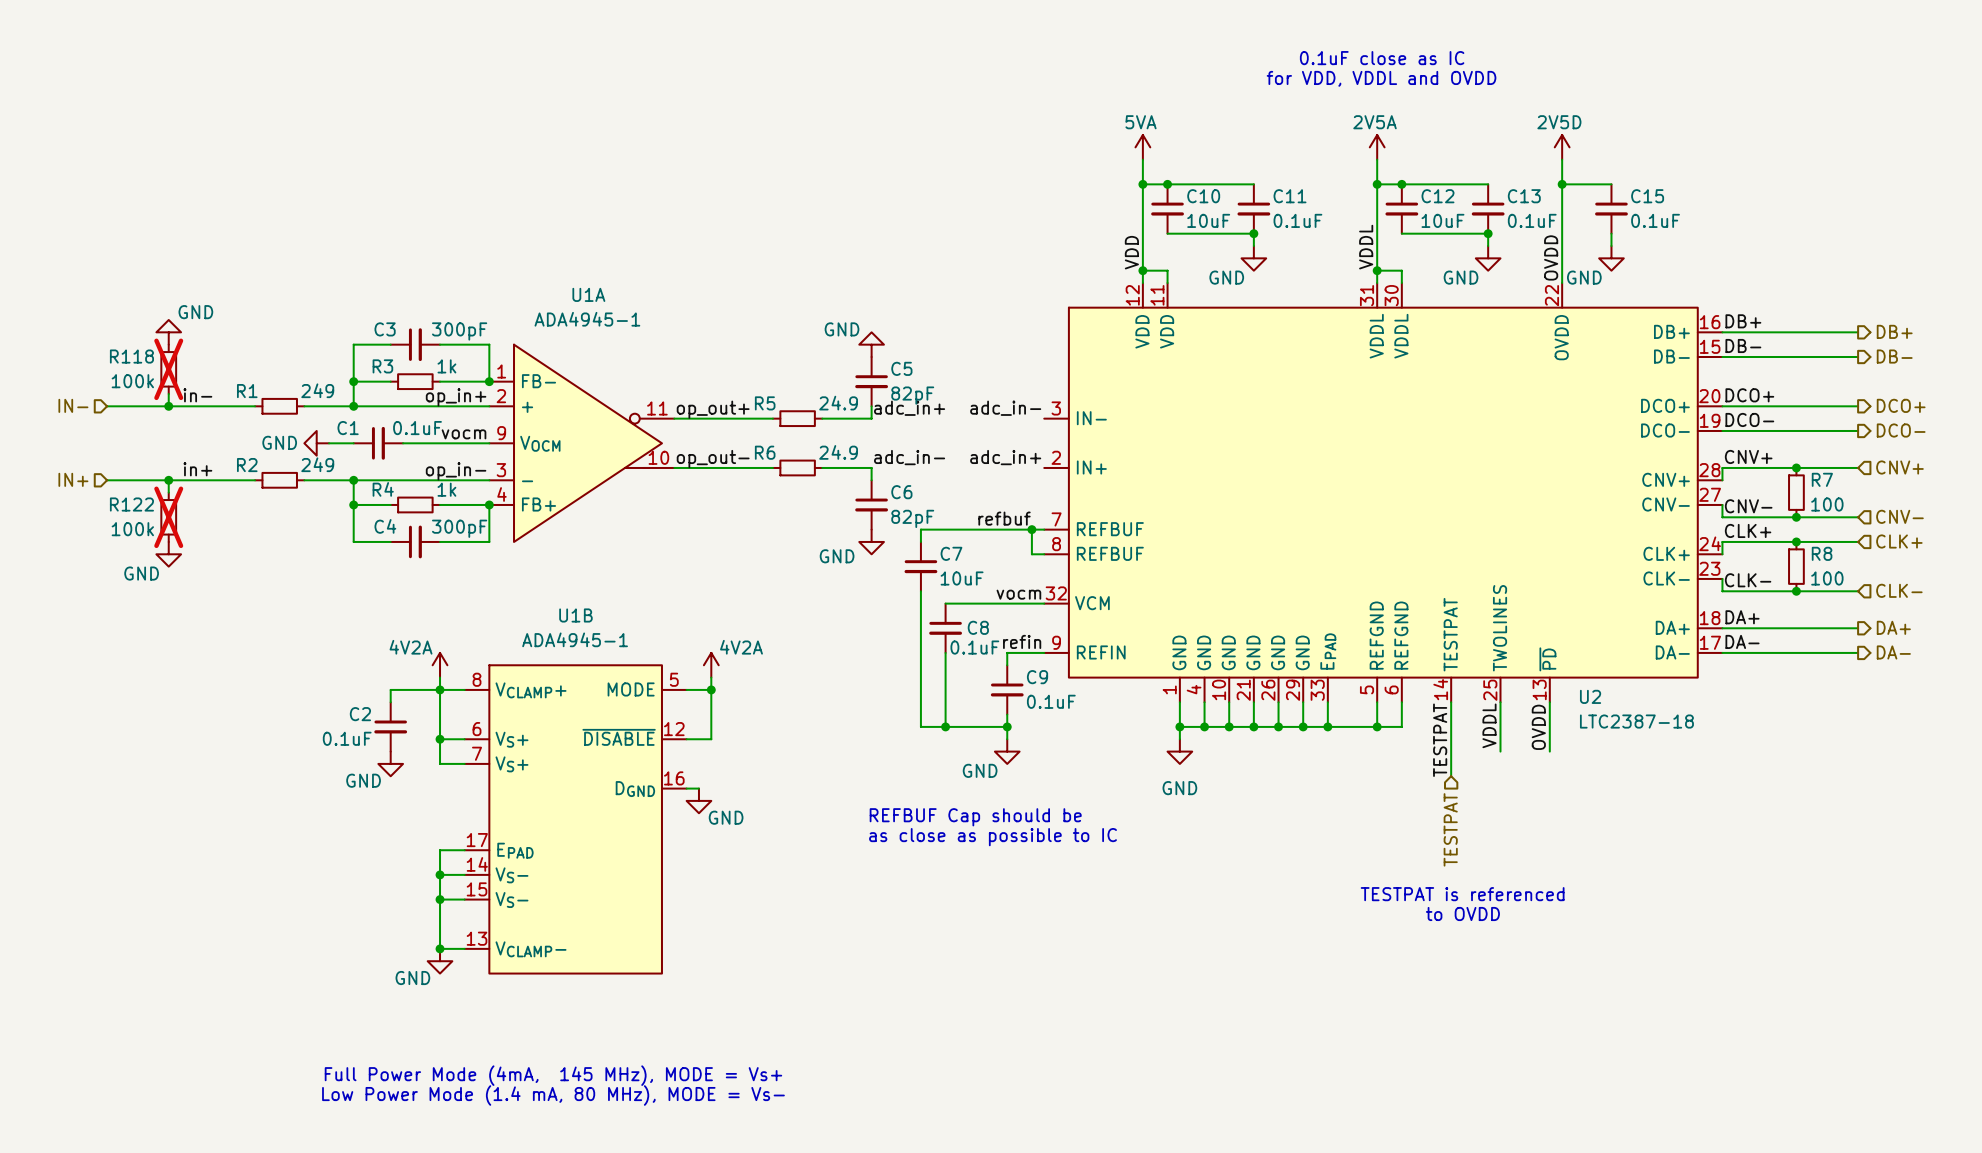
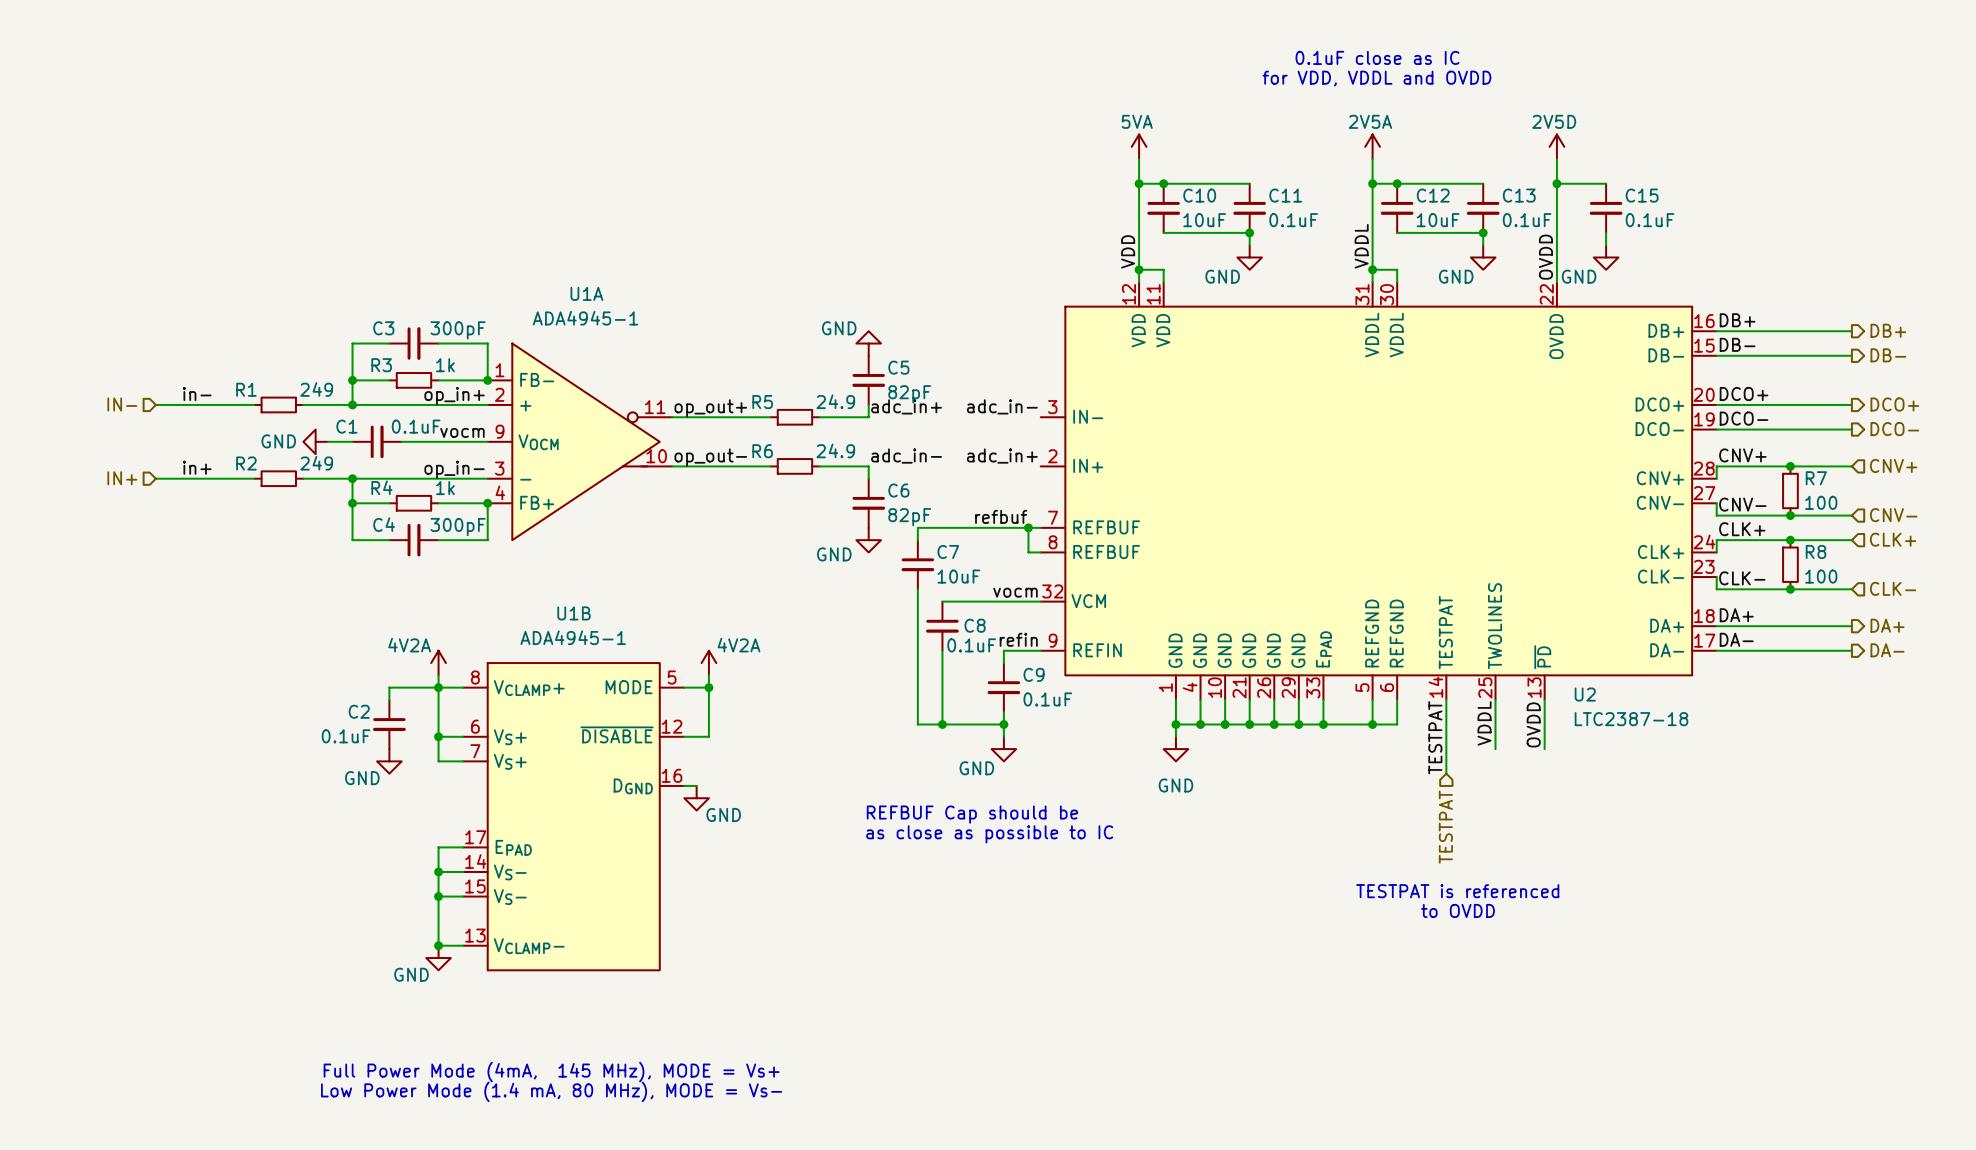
power symbol: GND (168, 332) -> none
R118: 100k (168, 369) -> none
wire: (168, 393) (168, 406) -> none
hierarchical label position: IN- (73, 405) -> IN- (122, 404)
wire: (107, 406) (156, 406) -> none
junction: (168, 406) -> none
hierarchical label position: IN+ (73, 479) -> IN+ (122, 478)
wire: (107, 480) (156, 480) -> none
wire: (168, 480) (168, 492) -> none
junction: (168, 480) -> none
R122: 100k (168, 517) -> none
power symbol: GND (168, 554) -> none

